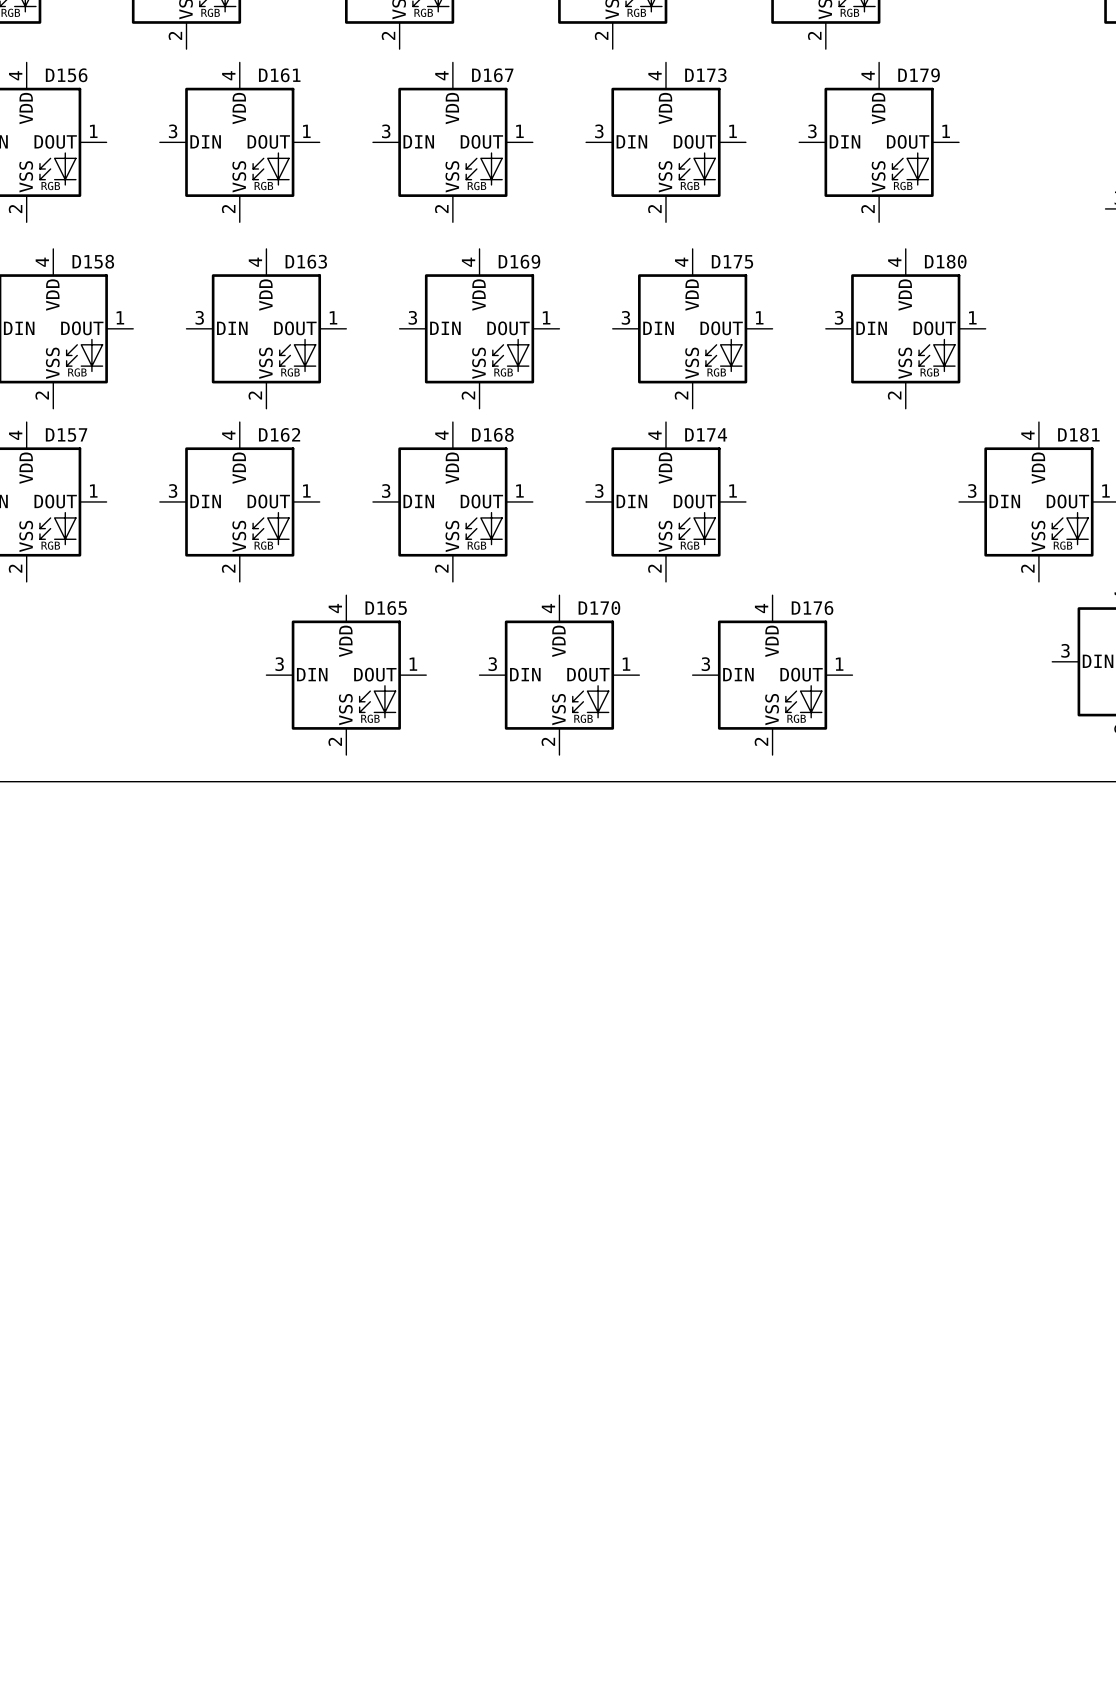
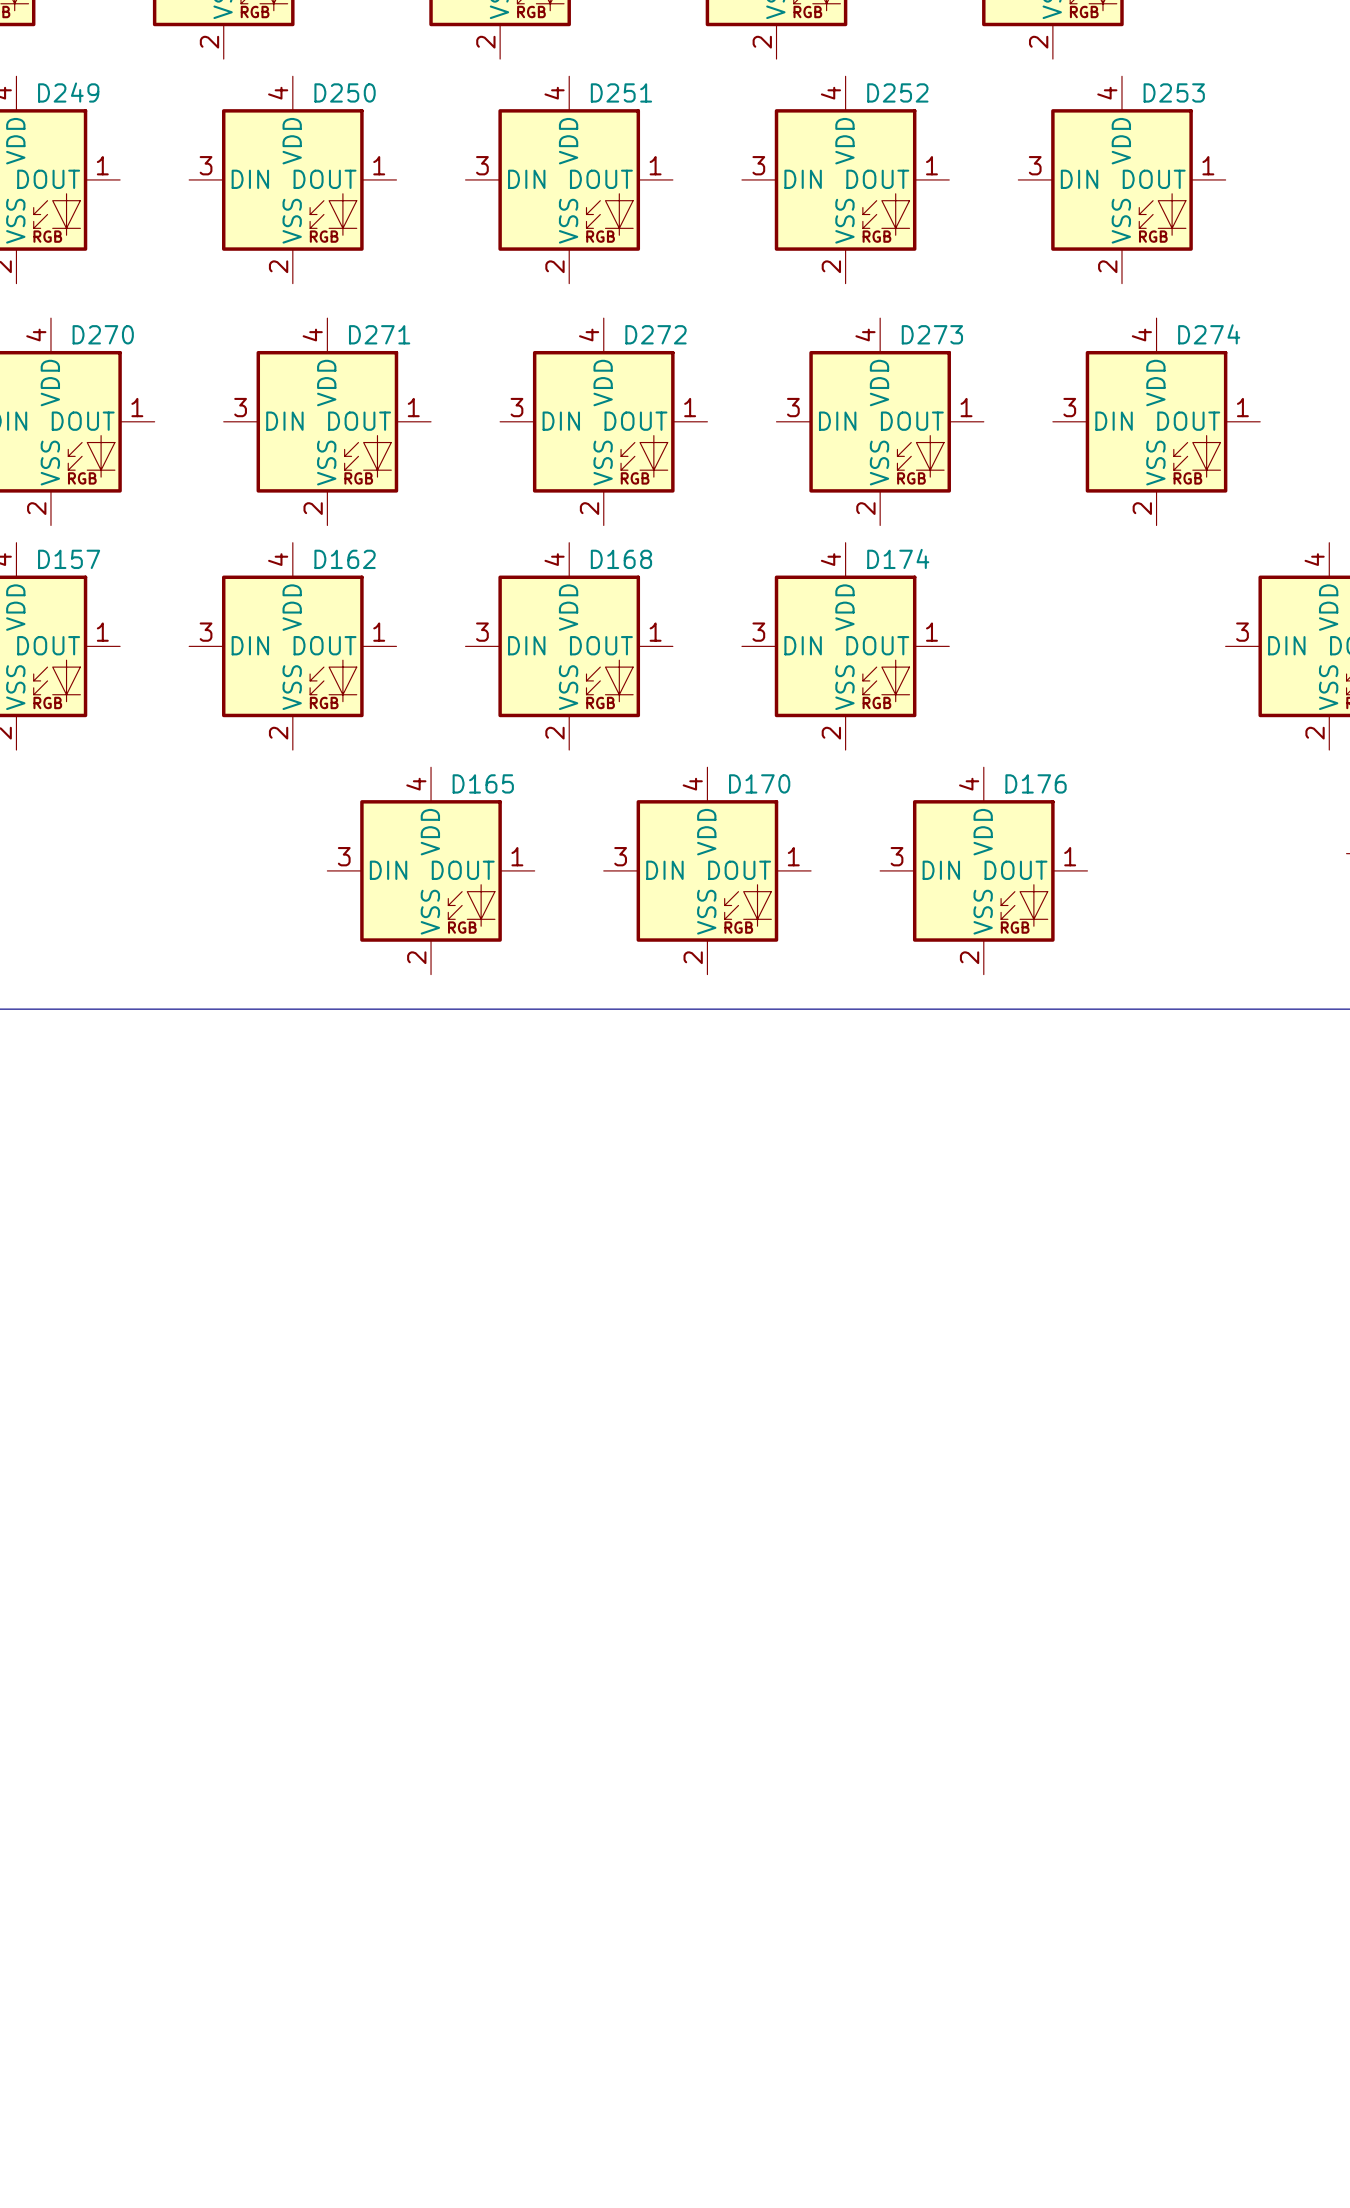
D156 name: D156 (66, 75) -> D249 (68, 92)
D161 name: D161 (279, 75) -> D250 (345, 92)
D167 name: D167 (492, 75) -> D251 (621, 92)
D173 name: D173 (705, 75) -> D252 (897, 92)
D179 name: D179 (919, 75) -> D253 (1174, 92)
D158 name: D158 (93, 261) -> D270 (103, 334)
D163 name: D163 (306, 261) -> D271 (379, 334)
D169 name: D169 (519, 261) -> D272 (656, 334)
D175 name: D175 (732, 261) -> D273 (932, 334)
D180 name: D180 (945, 261) -> D274 (1209, 334)

